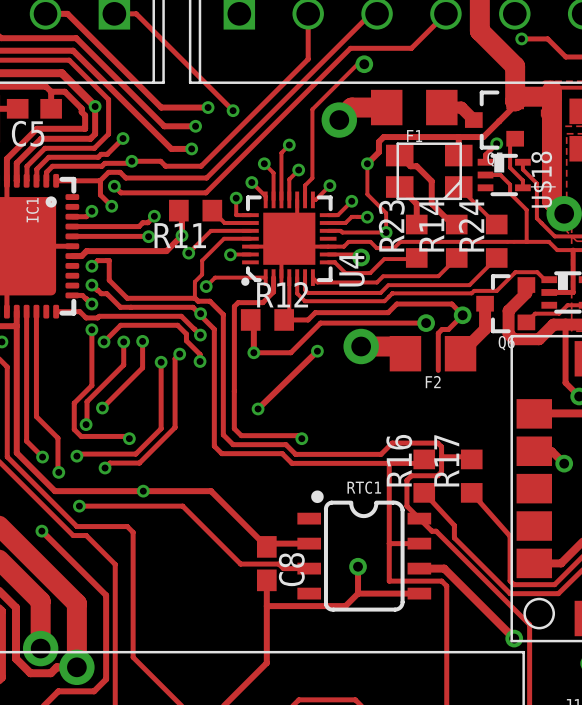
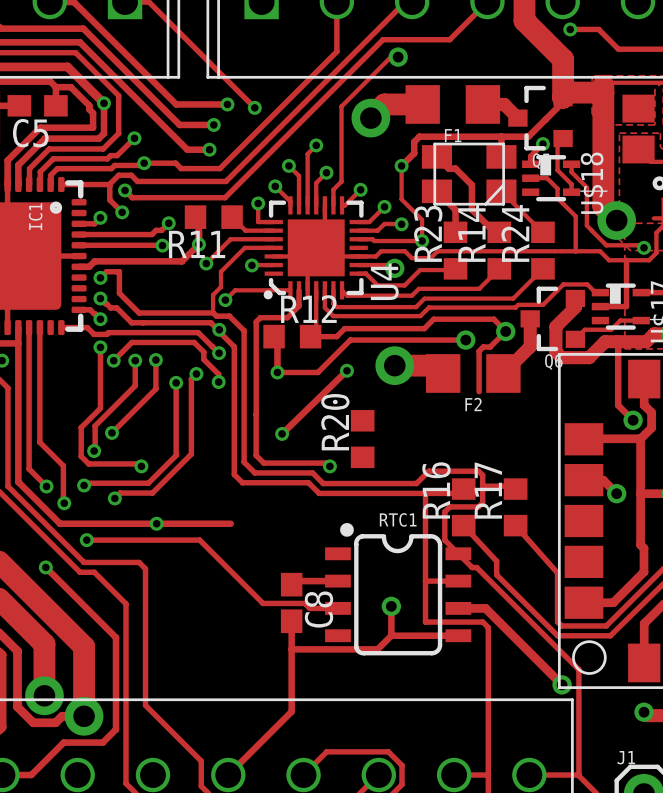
R20: none -> (362, 439)
track: (211, 491) (266, 546) -> none

